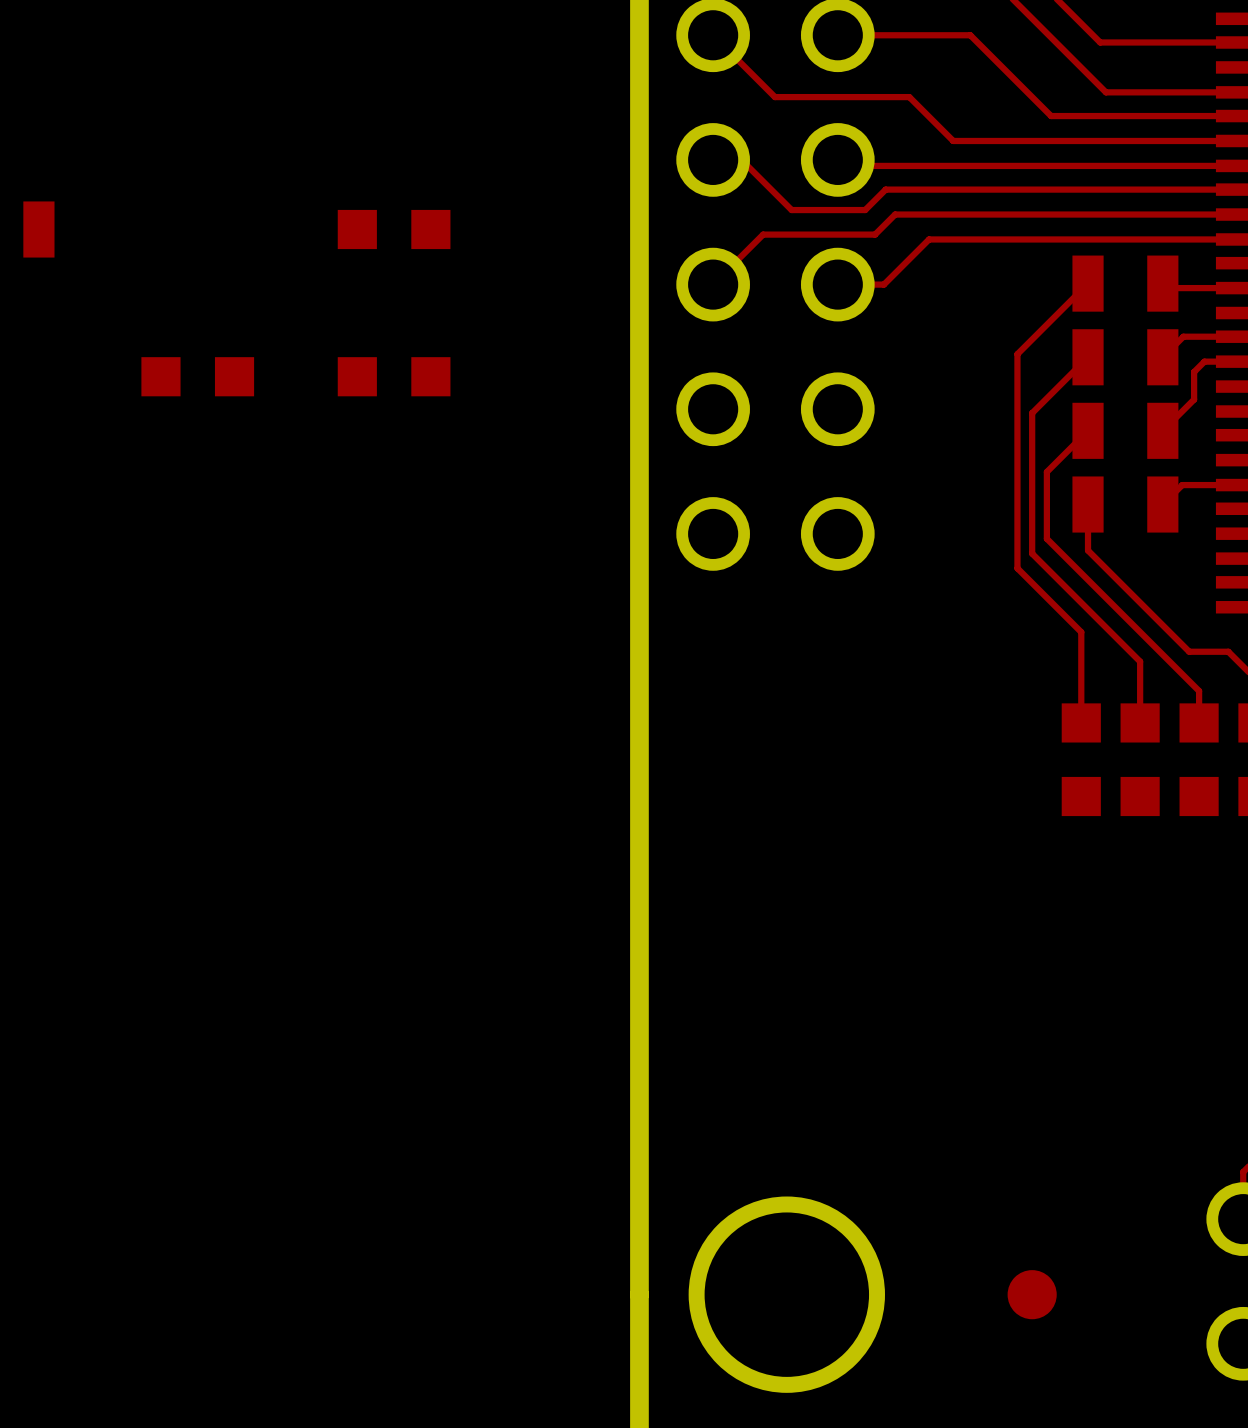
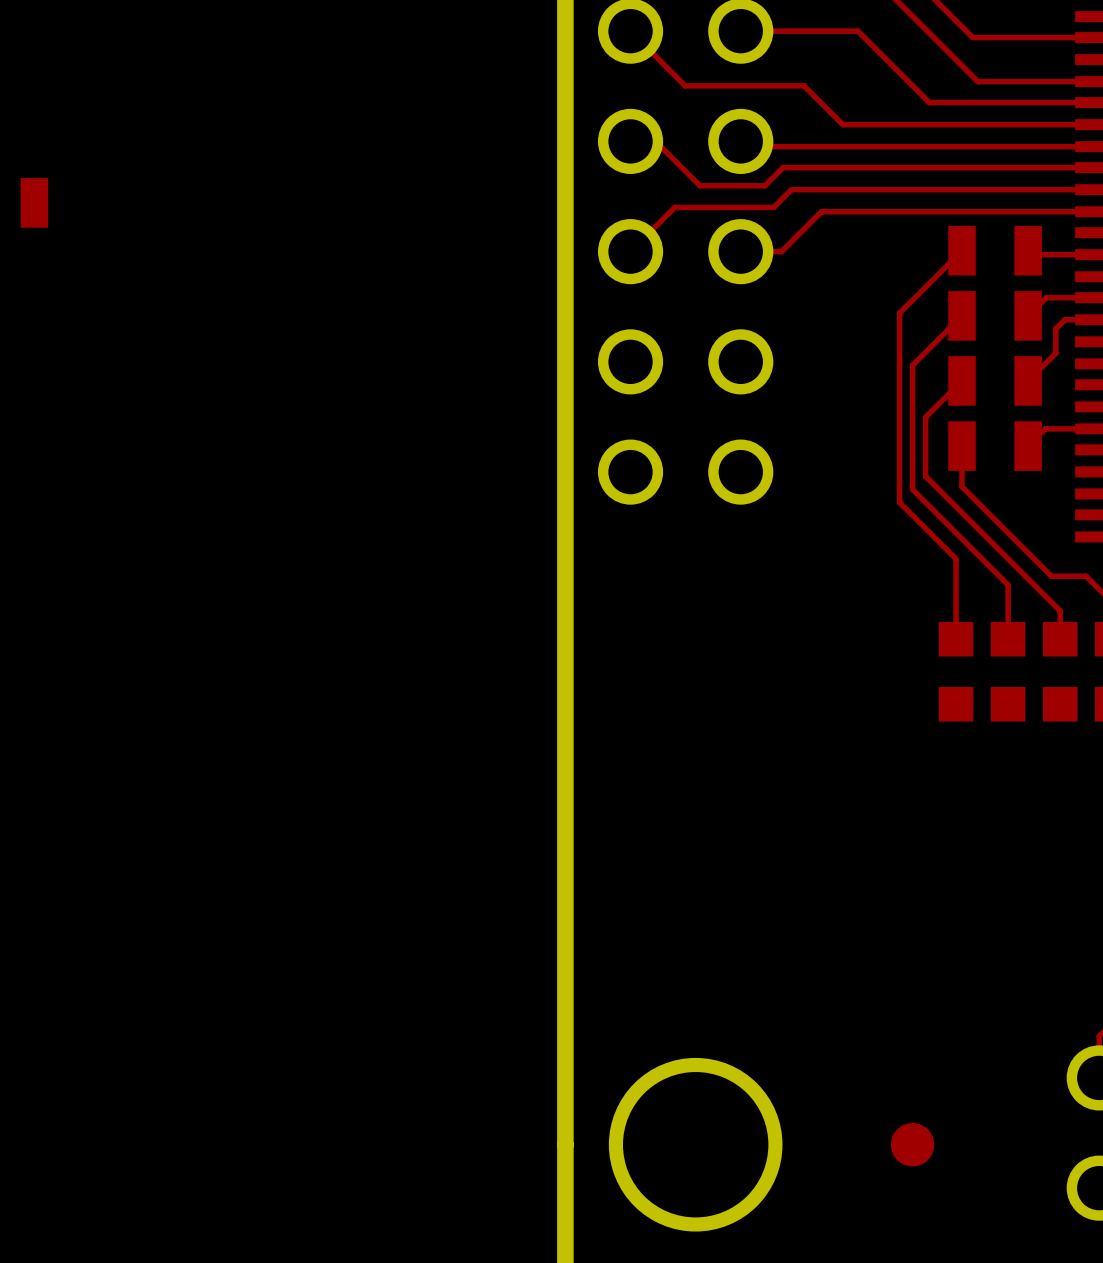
part: (394, 229) -> none
part: (197, 376) -> none
part: (394, 376) -> none

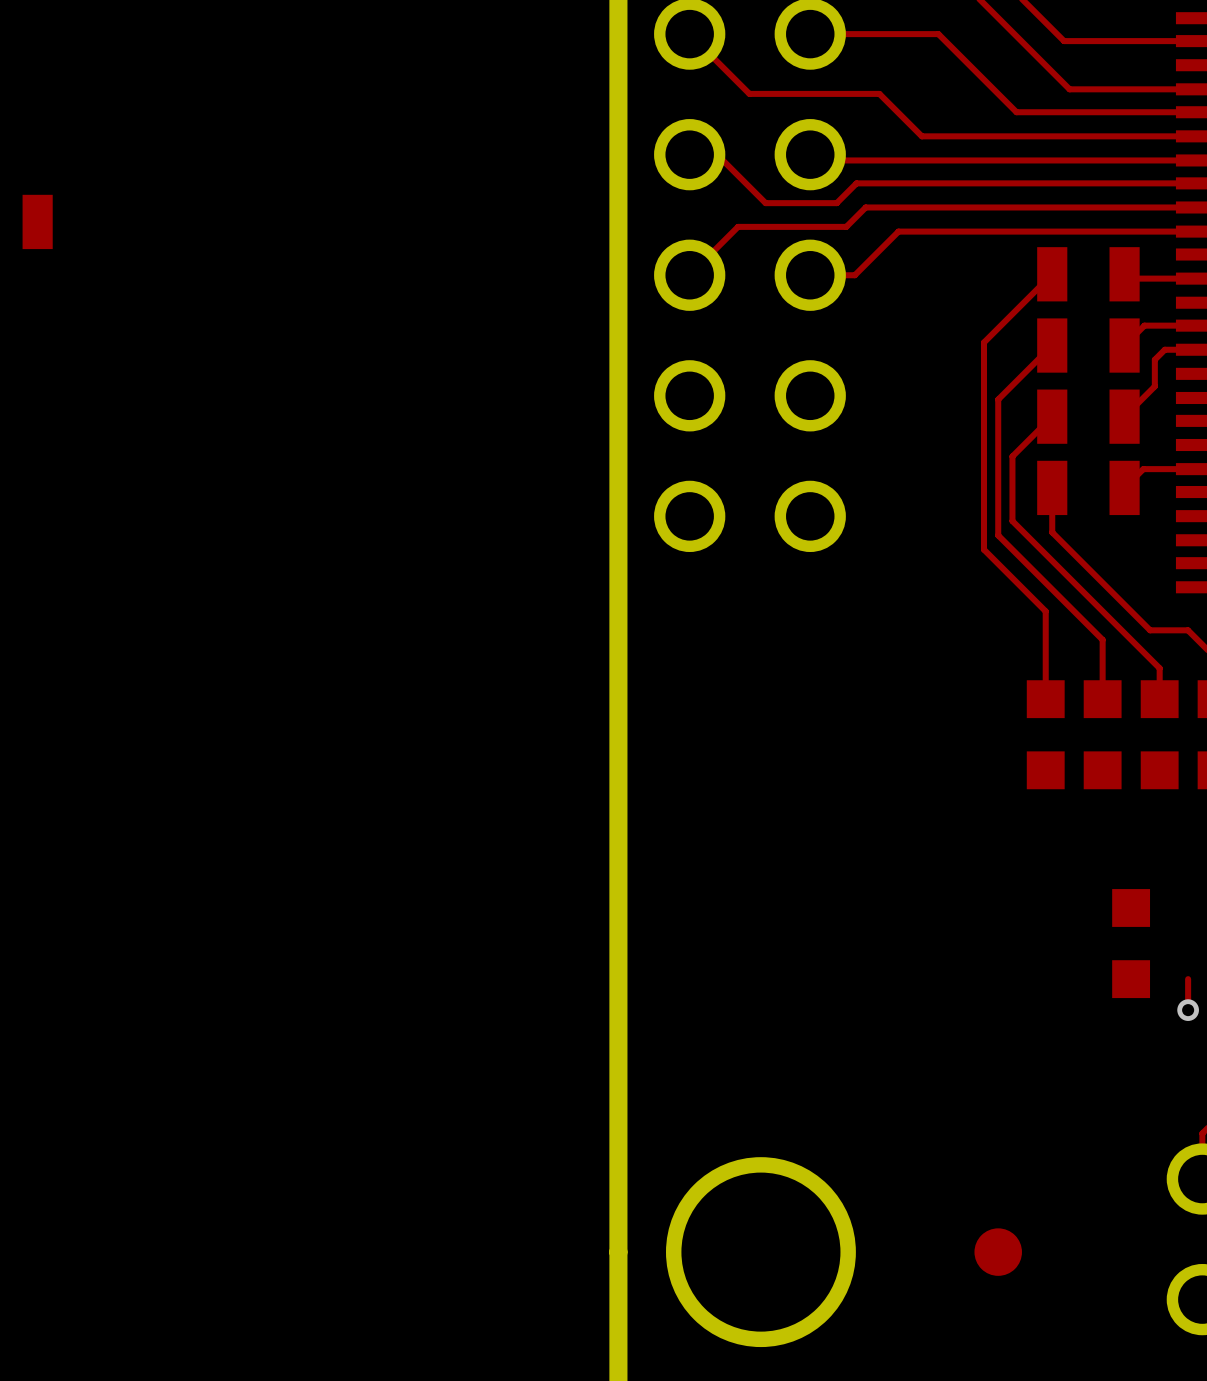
part: none -> (1131, 943)
top track: none -> (1188, 979) (1188, 1010)
via: none -> (1188, 1010)

